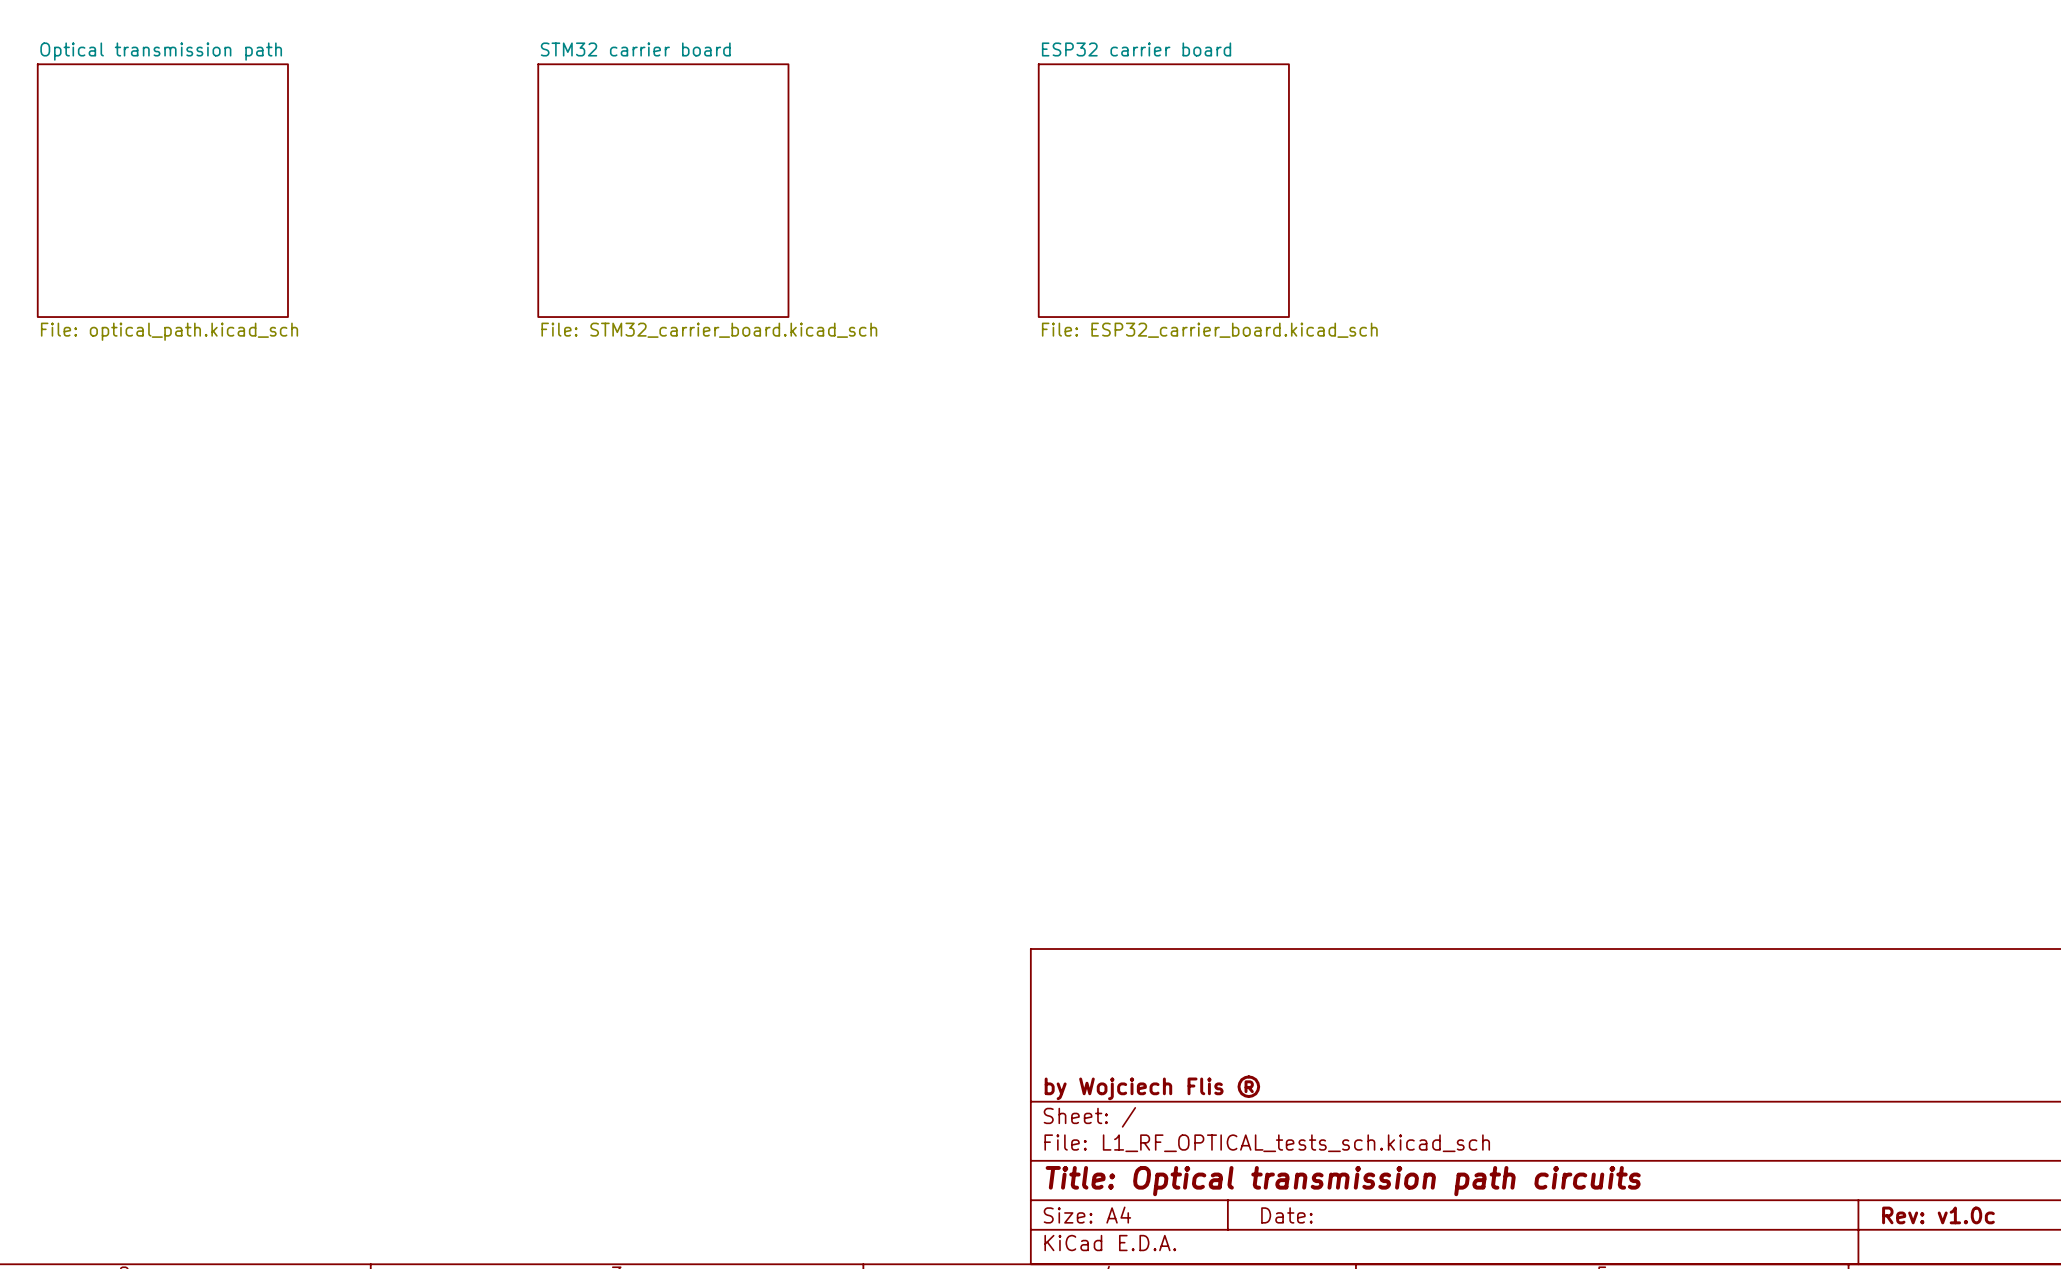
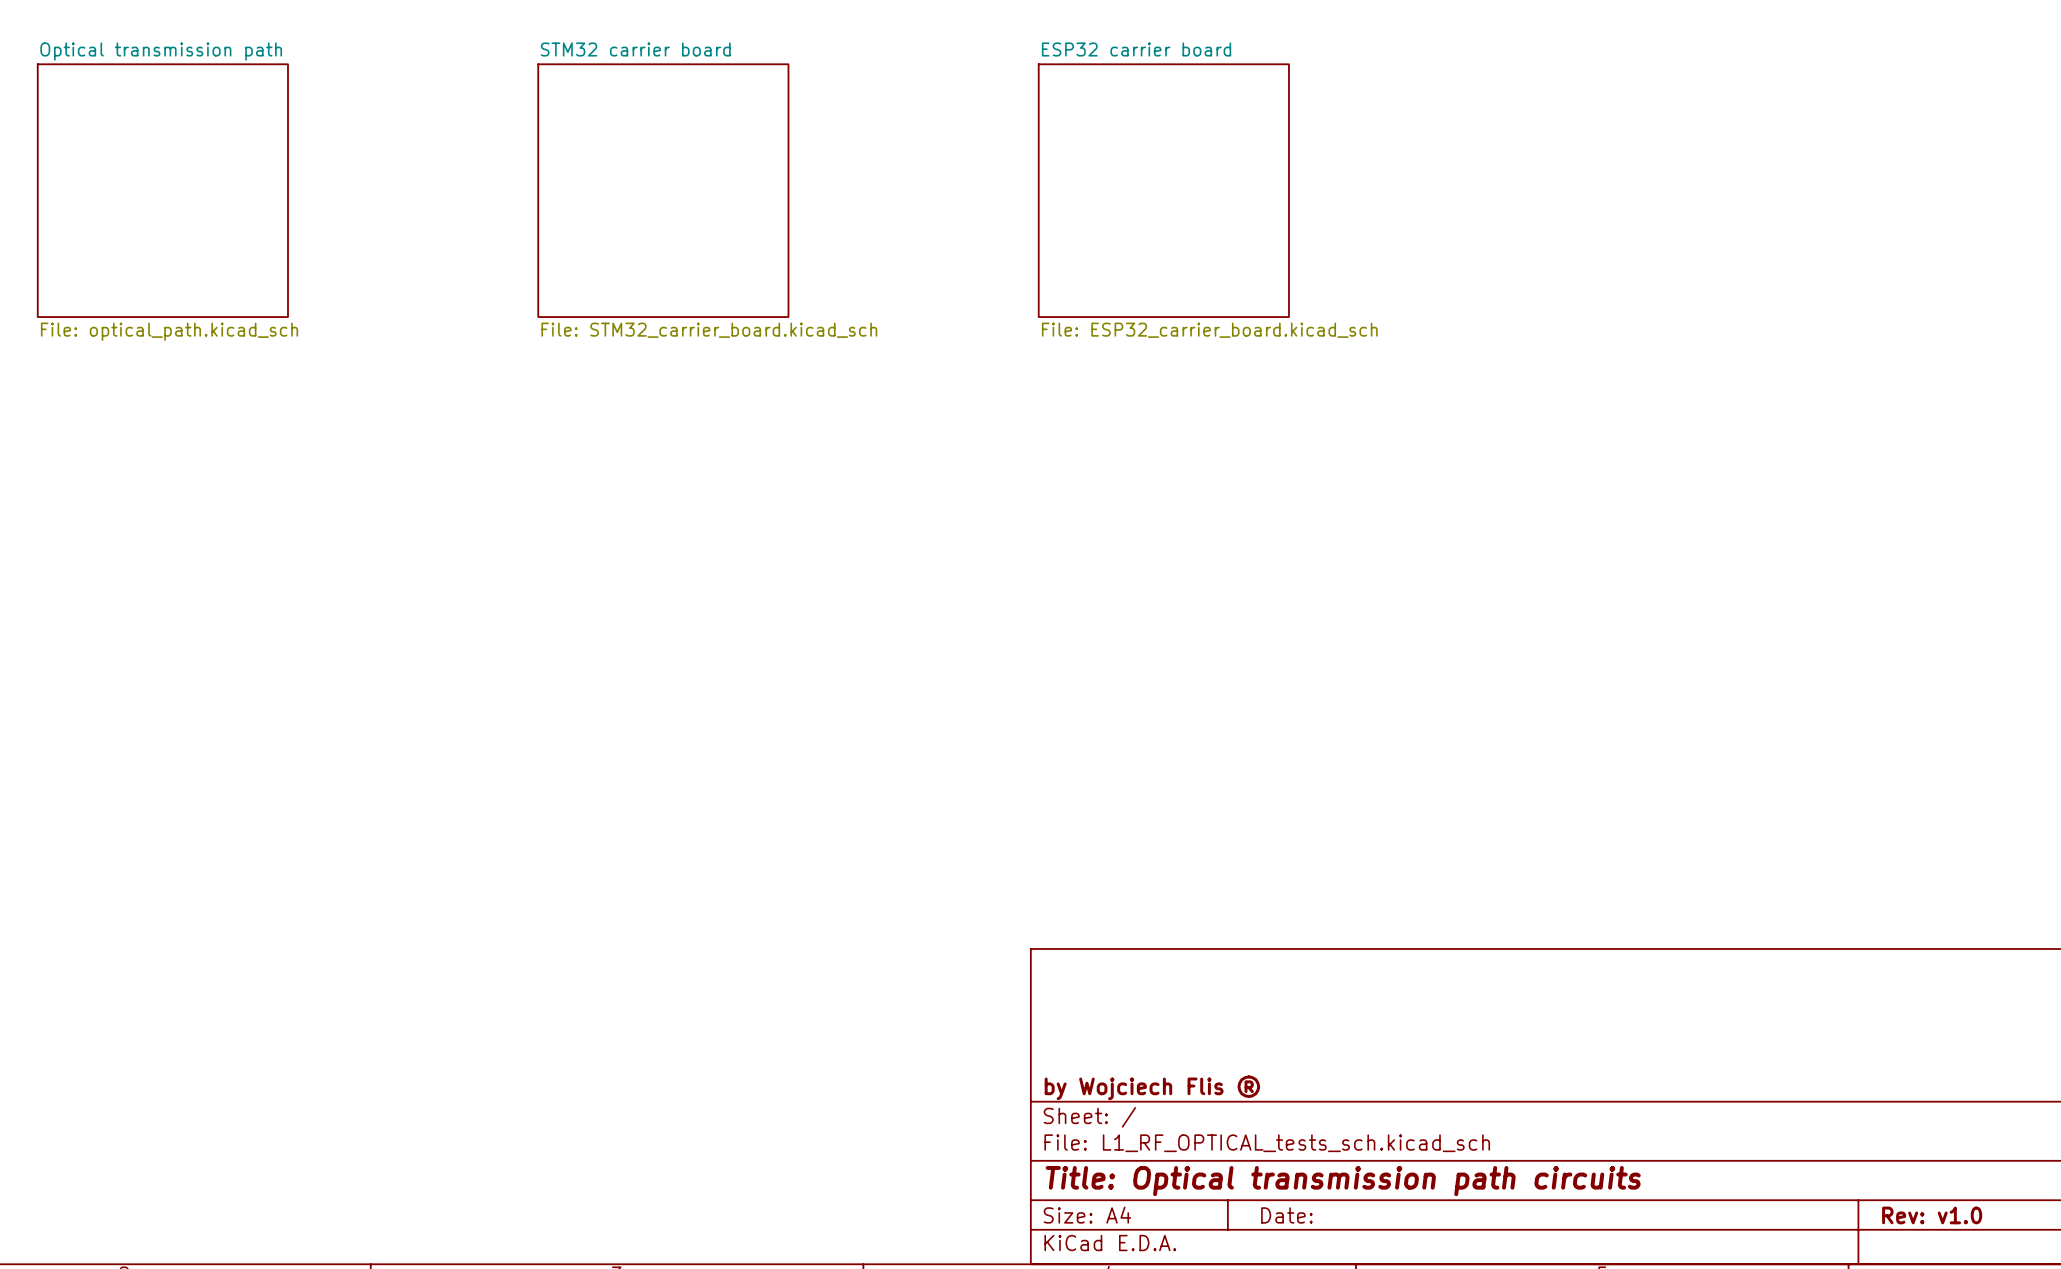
title block: Rev: v1.0c (1938, 1215) -> Rev: v1.0 (1932, 1215)

